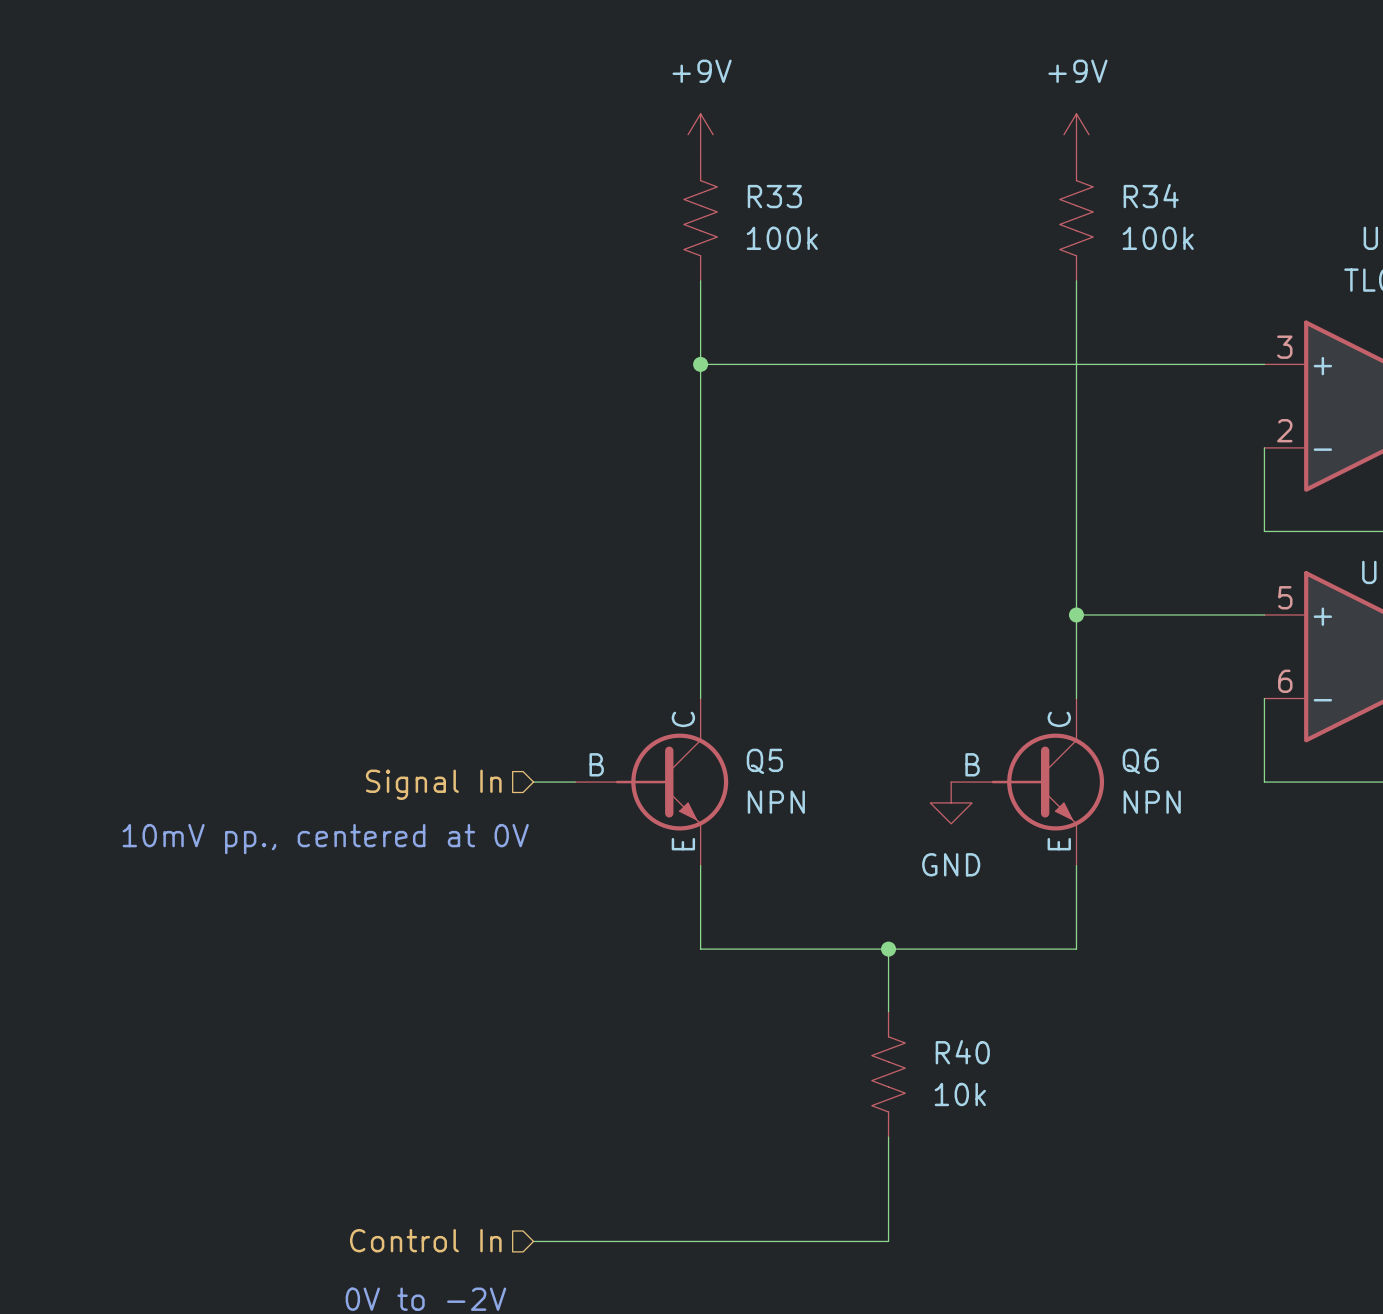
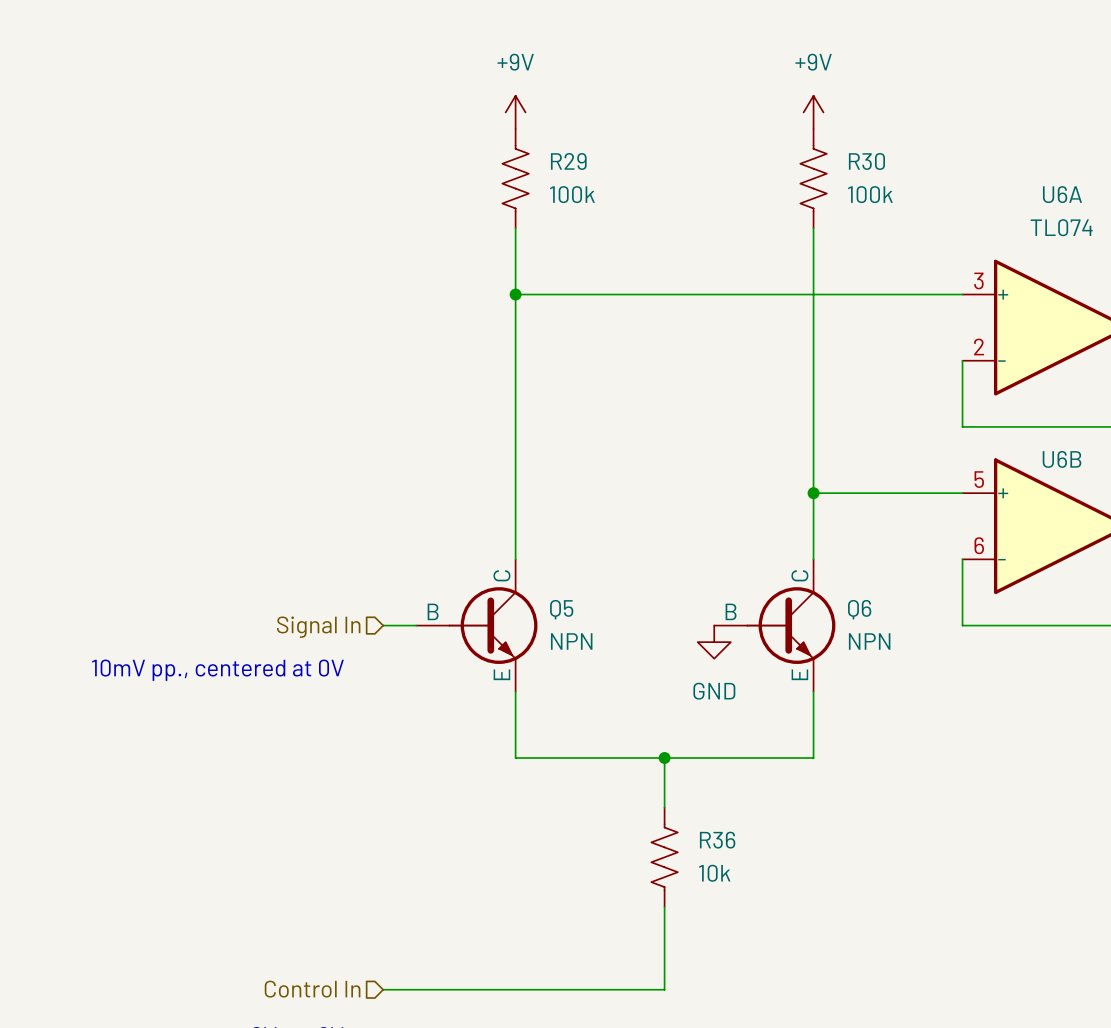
R33 name: R33 (774, 196) -> R29 (568, 161)
R34 name: R34 (1151, 196) -> R30 (866, 161)
R40 name: R40 (962, 1052) -> R36 (717, 840)

